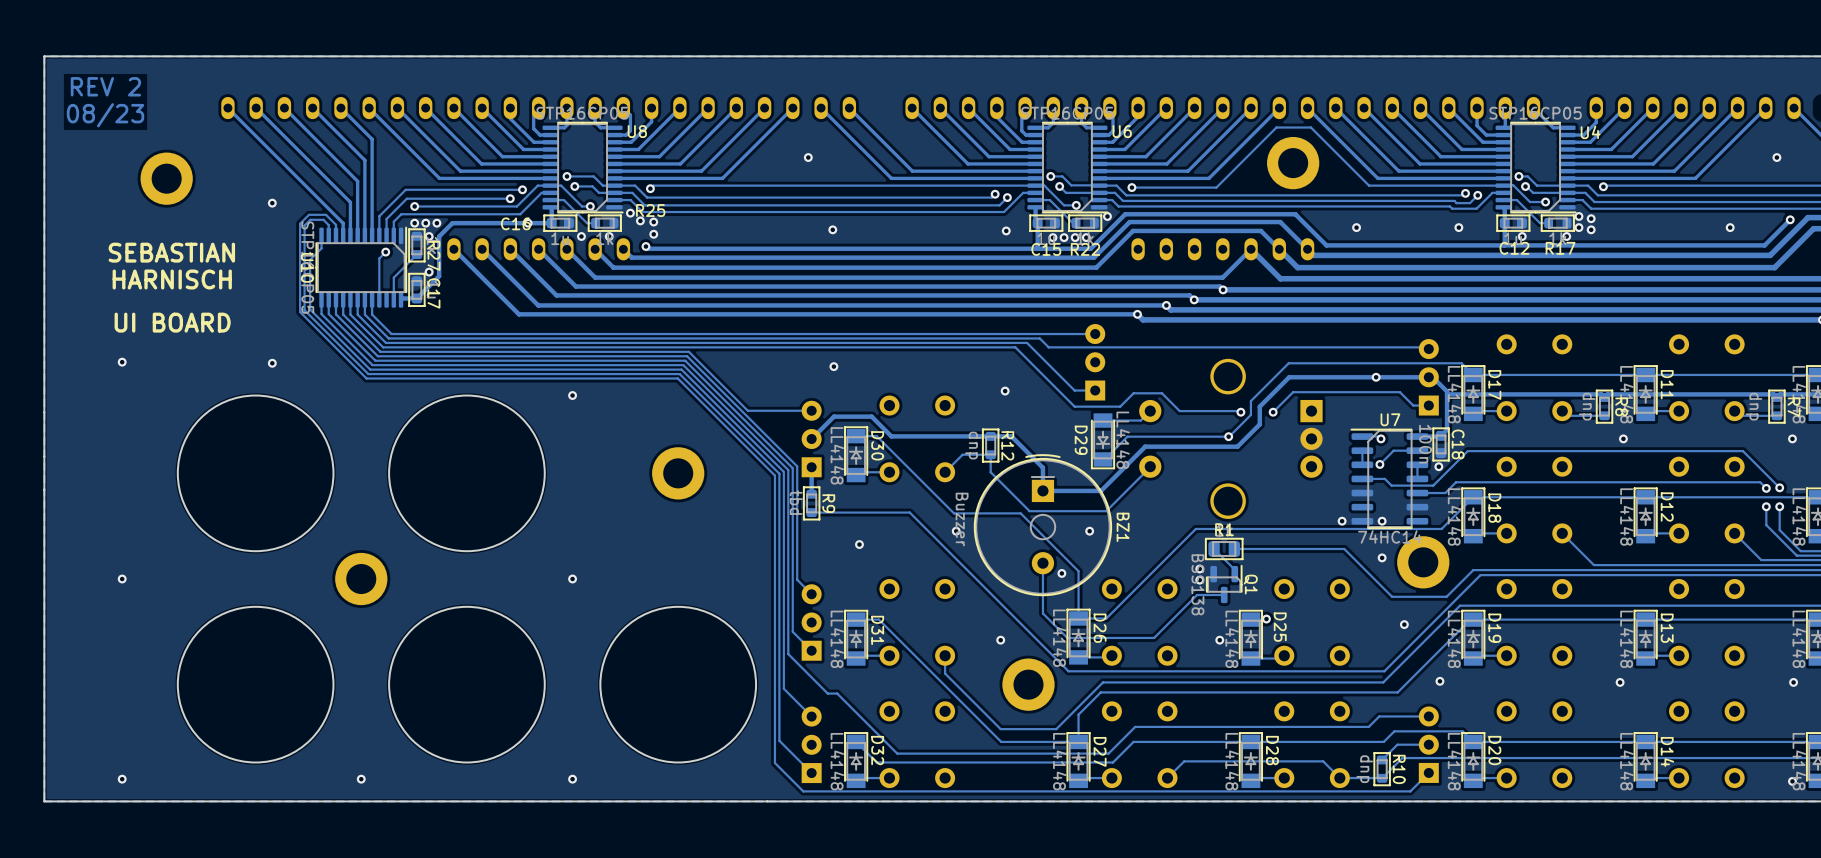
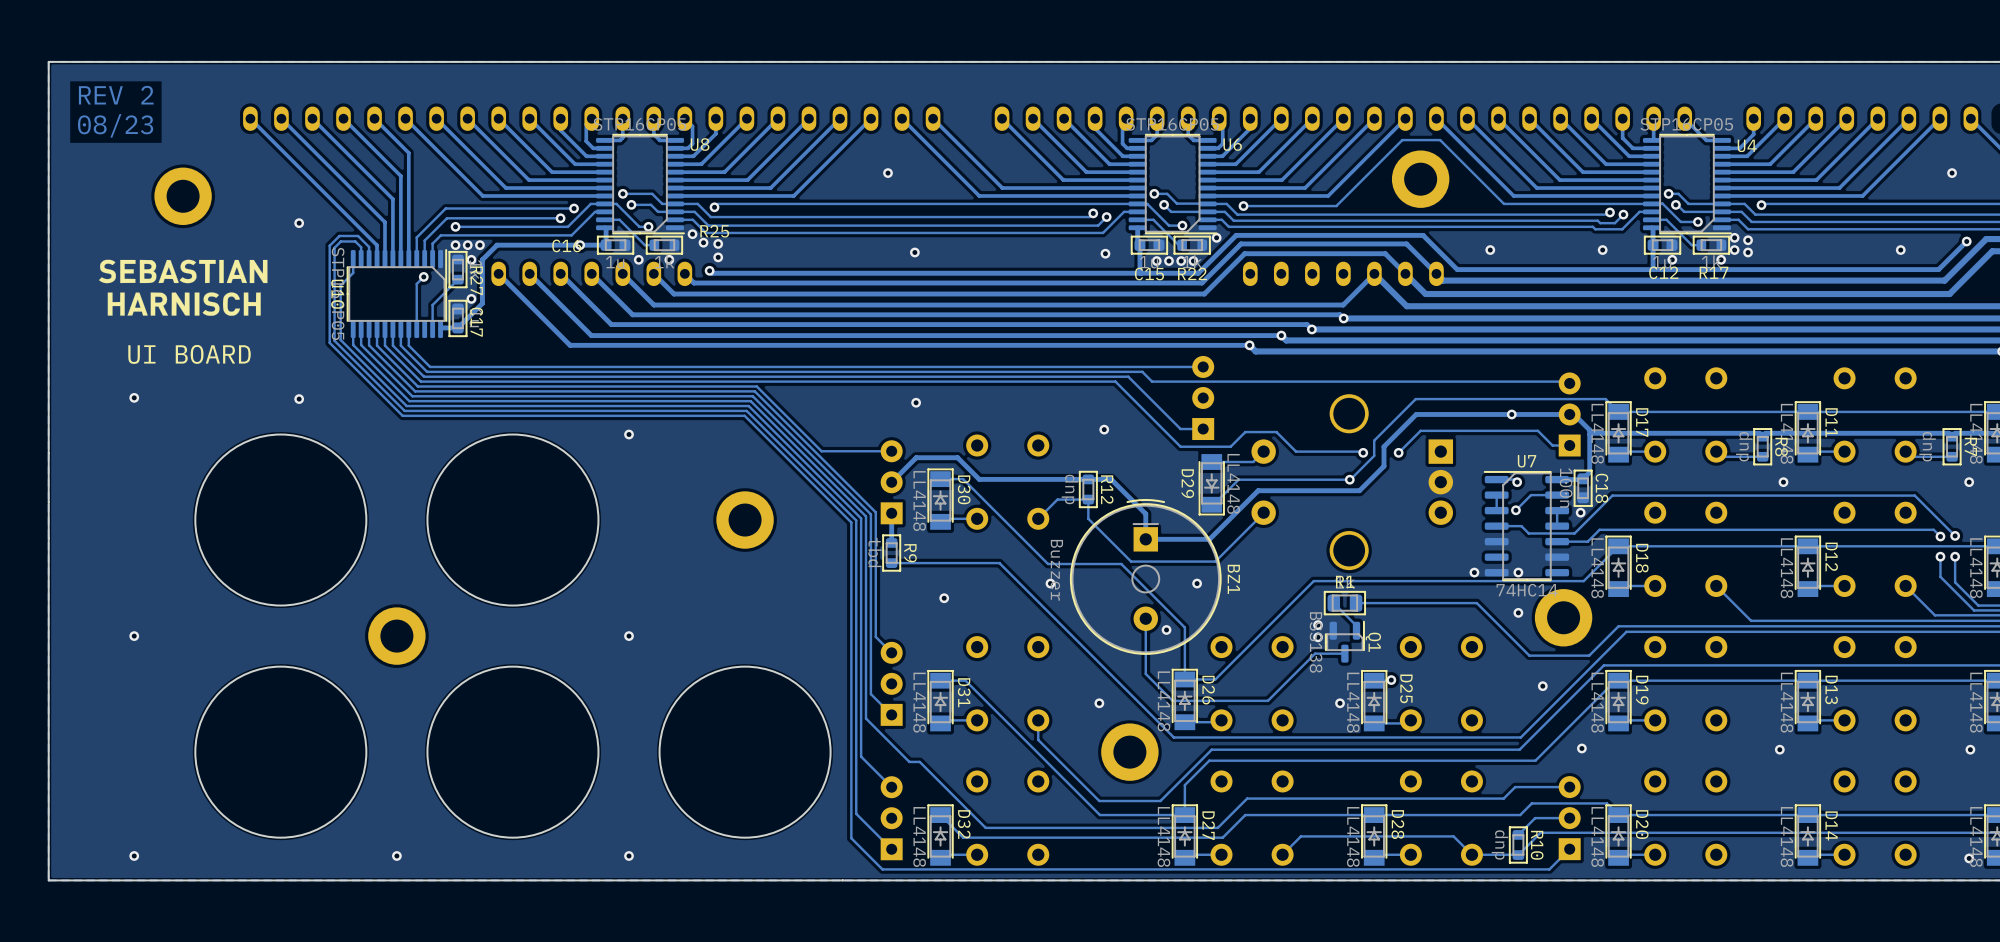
drawing: none -> [99, 259, 268, 316]
text: SEBASTIAN (171, 252) -> none
text: HARNISCH (172, 279) -> none

